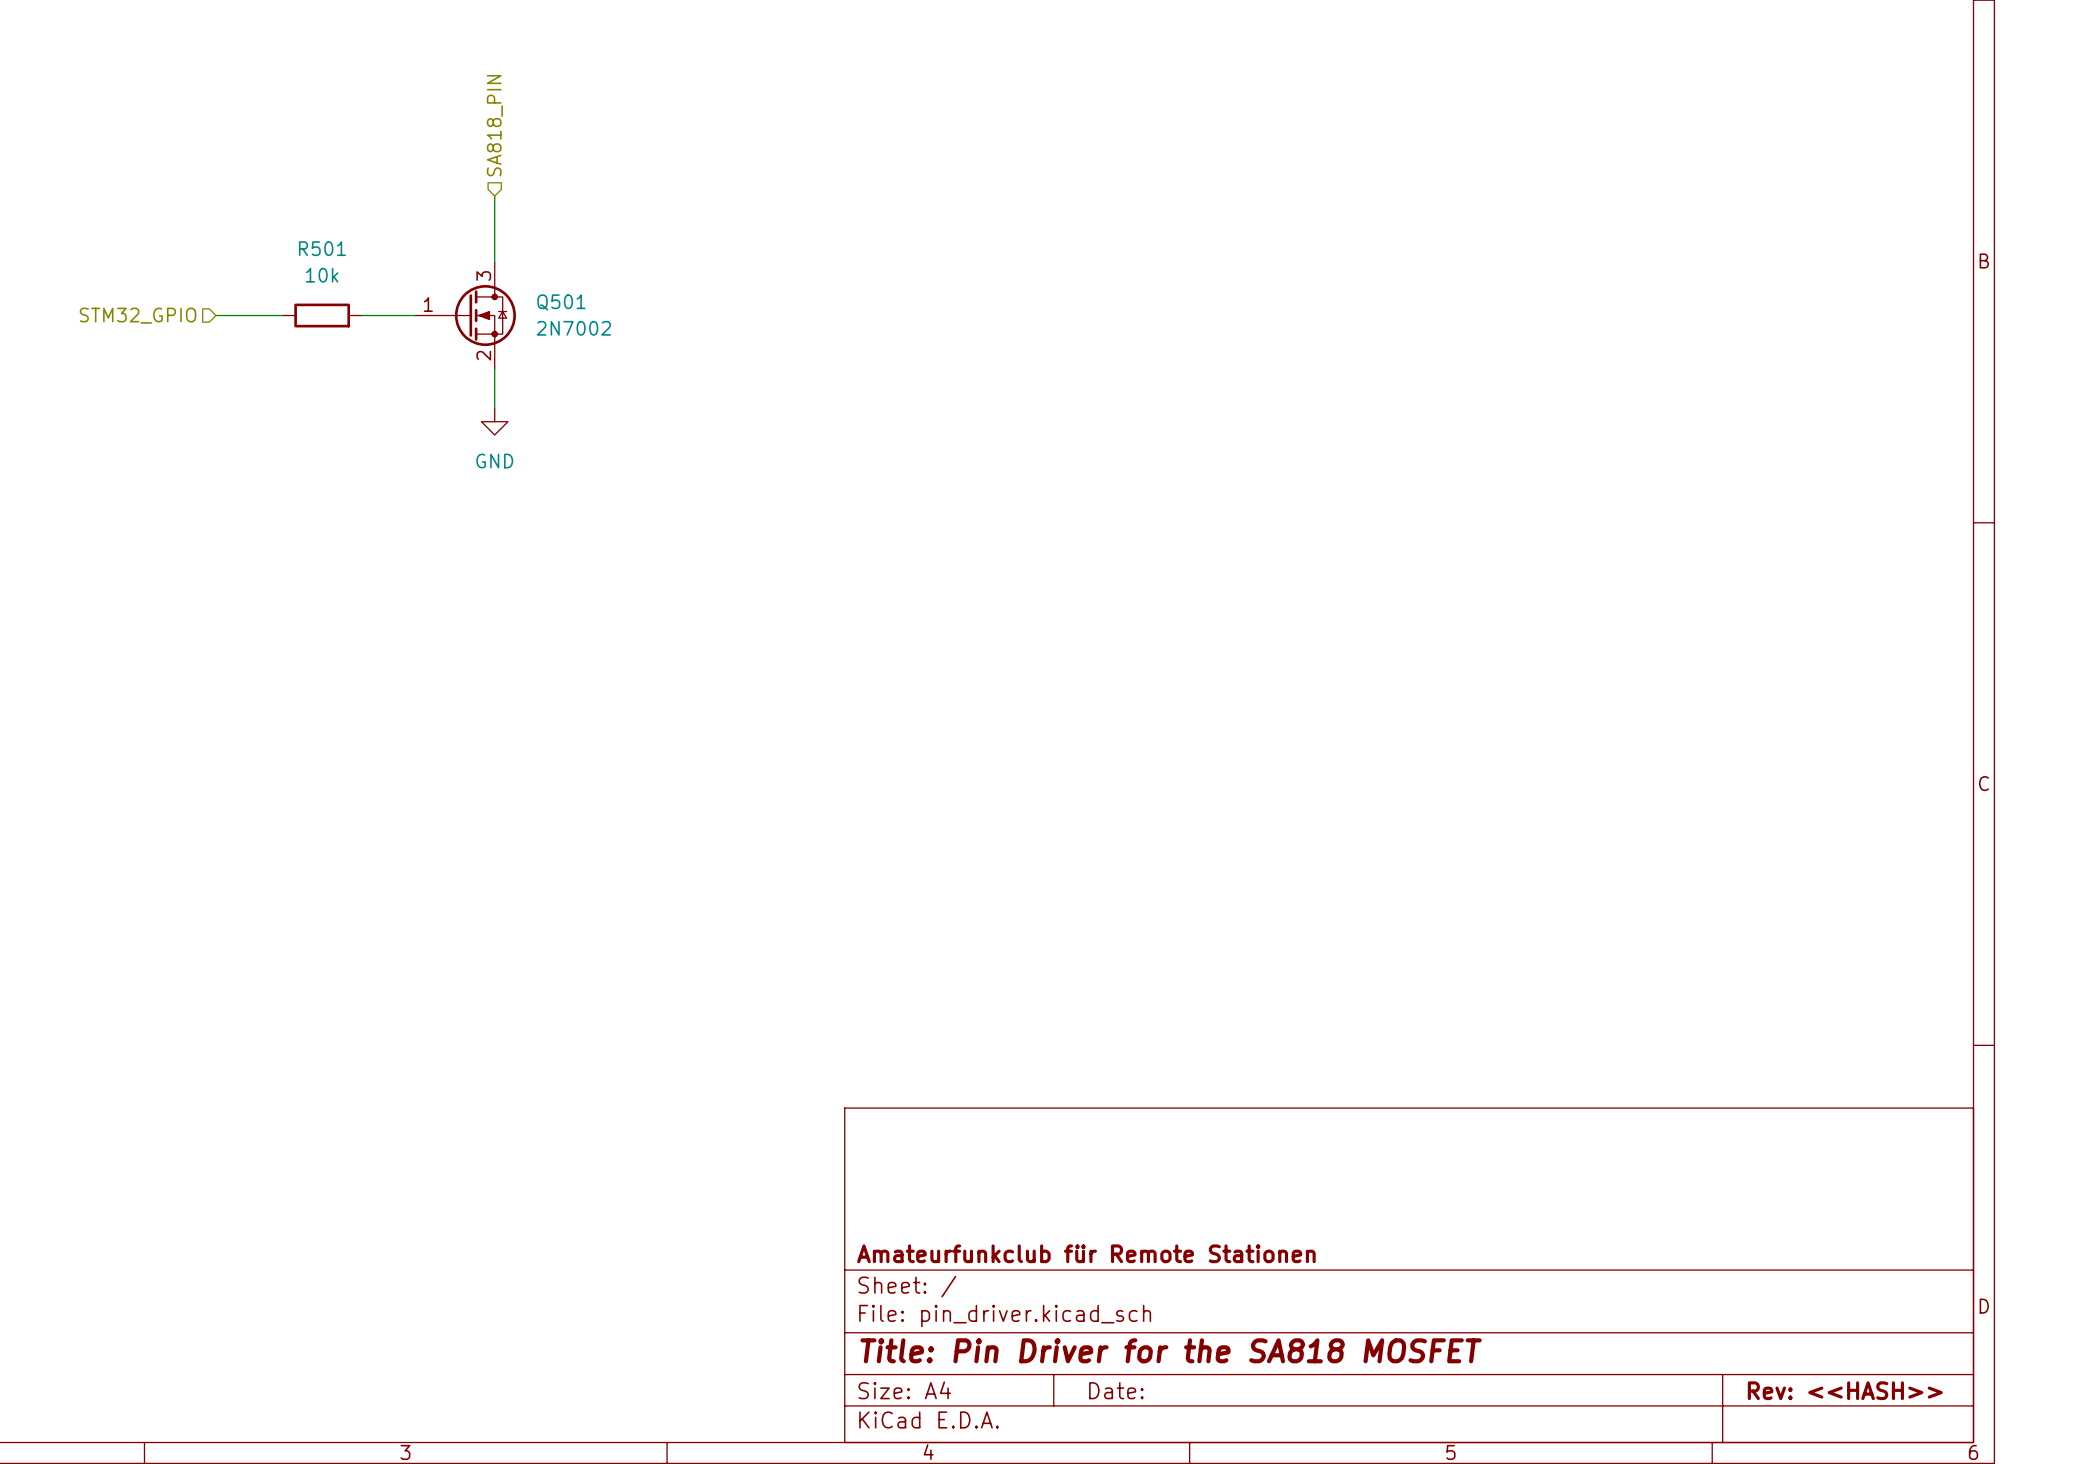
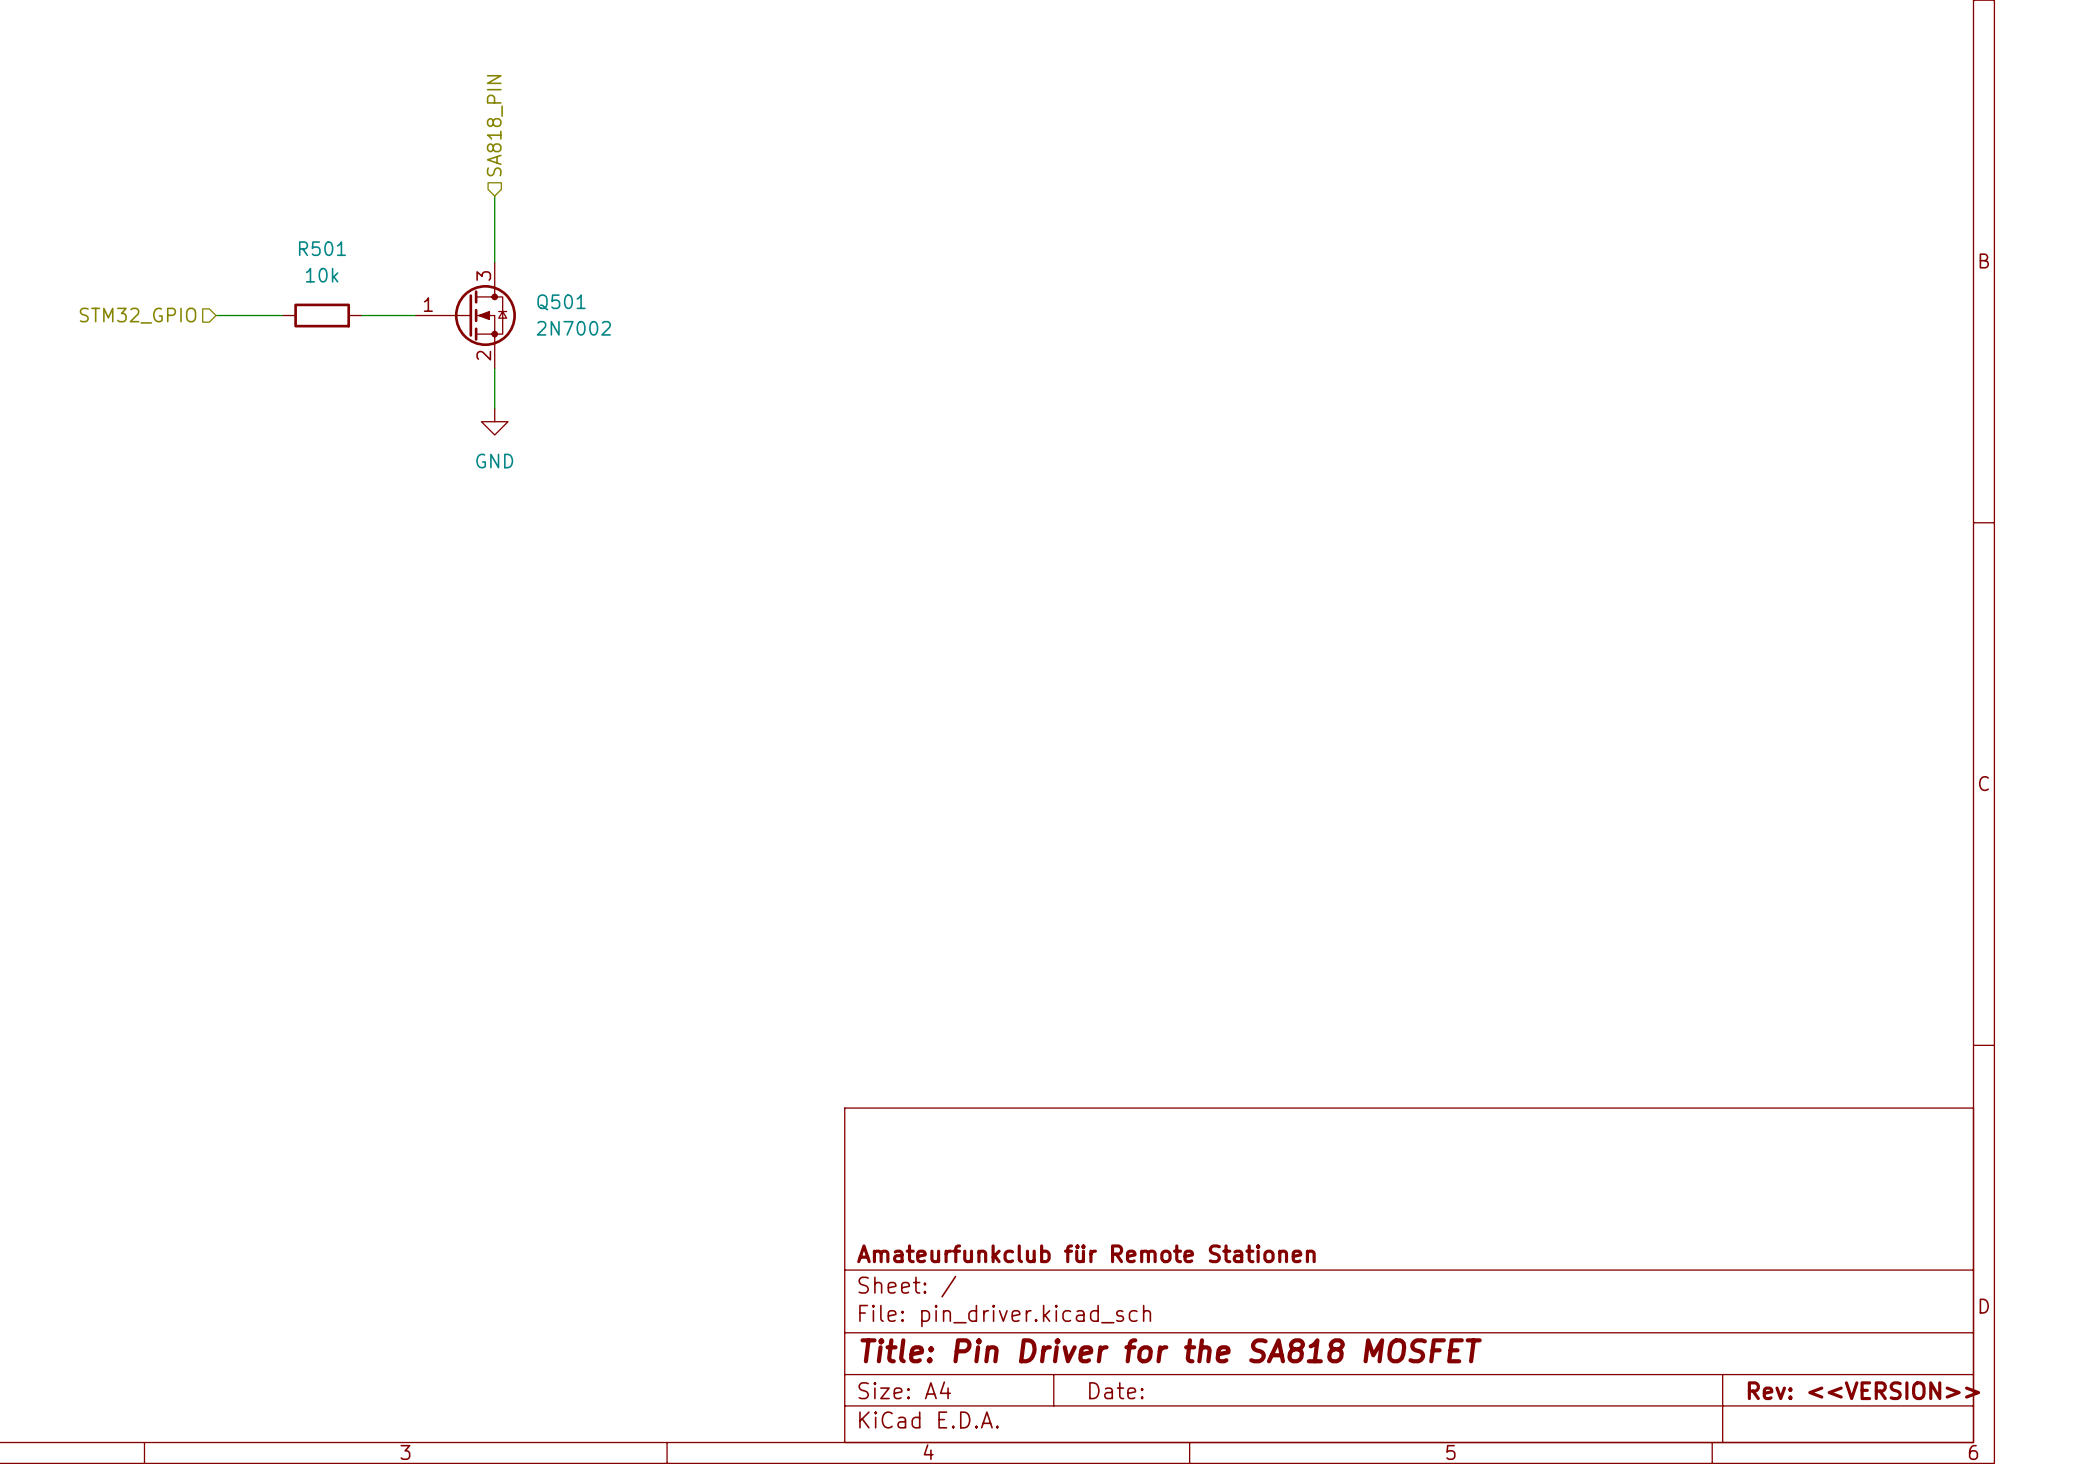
title block: Rev: <<HASH>> (1845, 1390) -> Rev: <<VERSION>> (1863, 1390)

